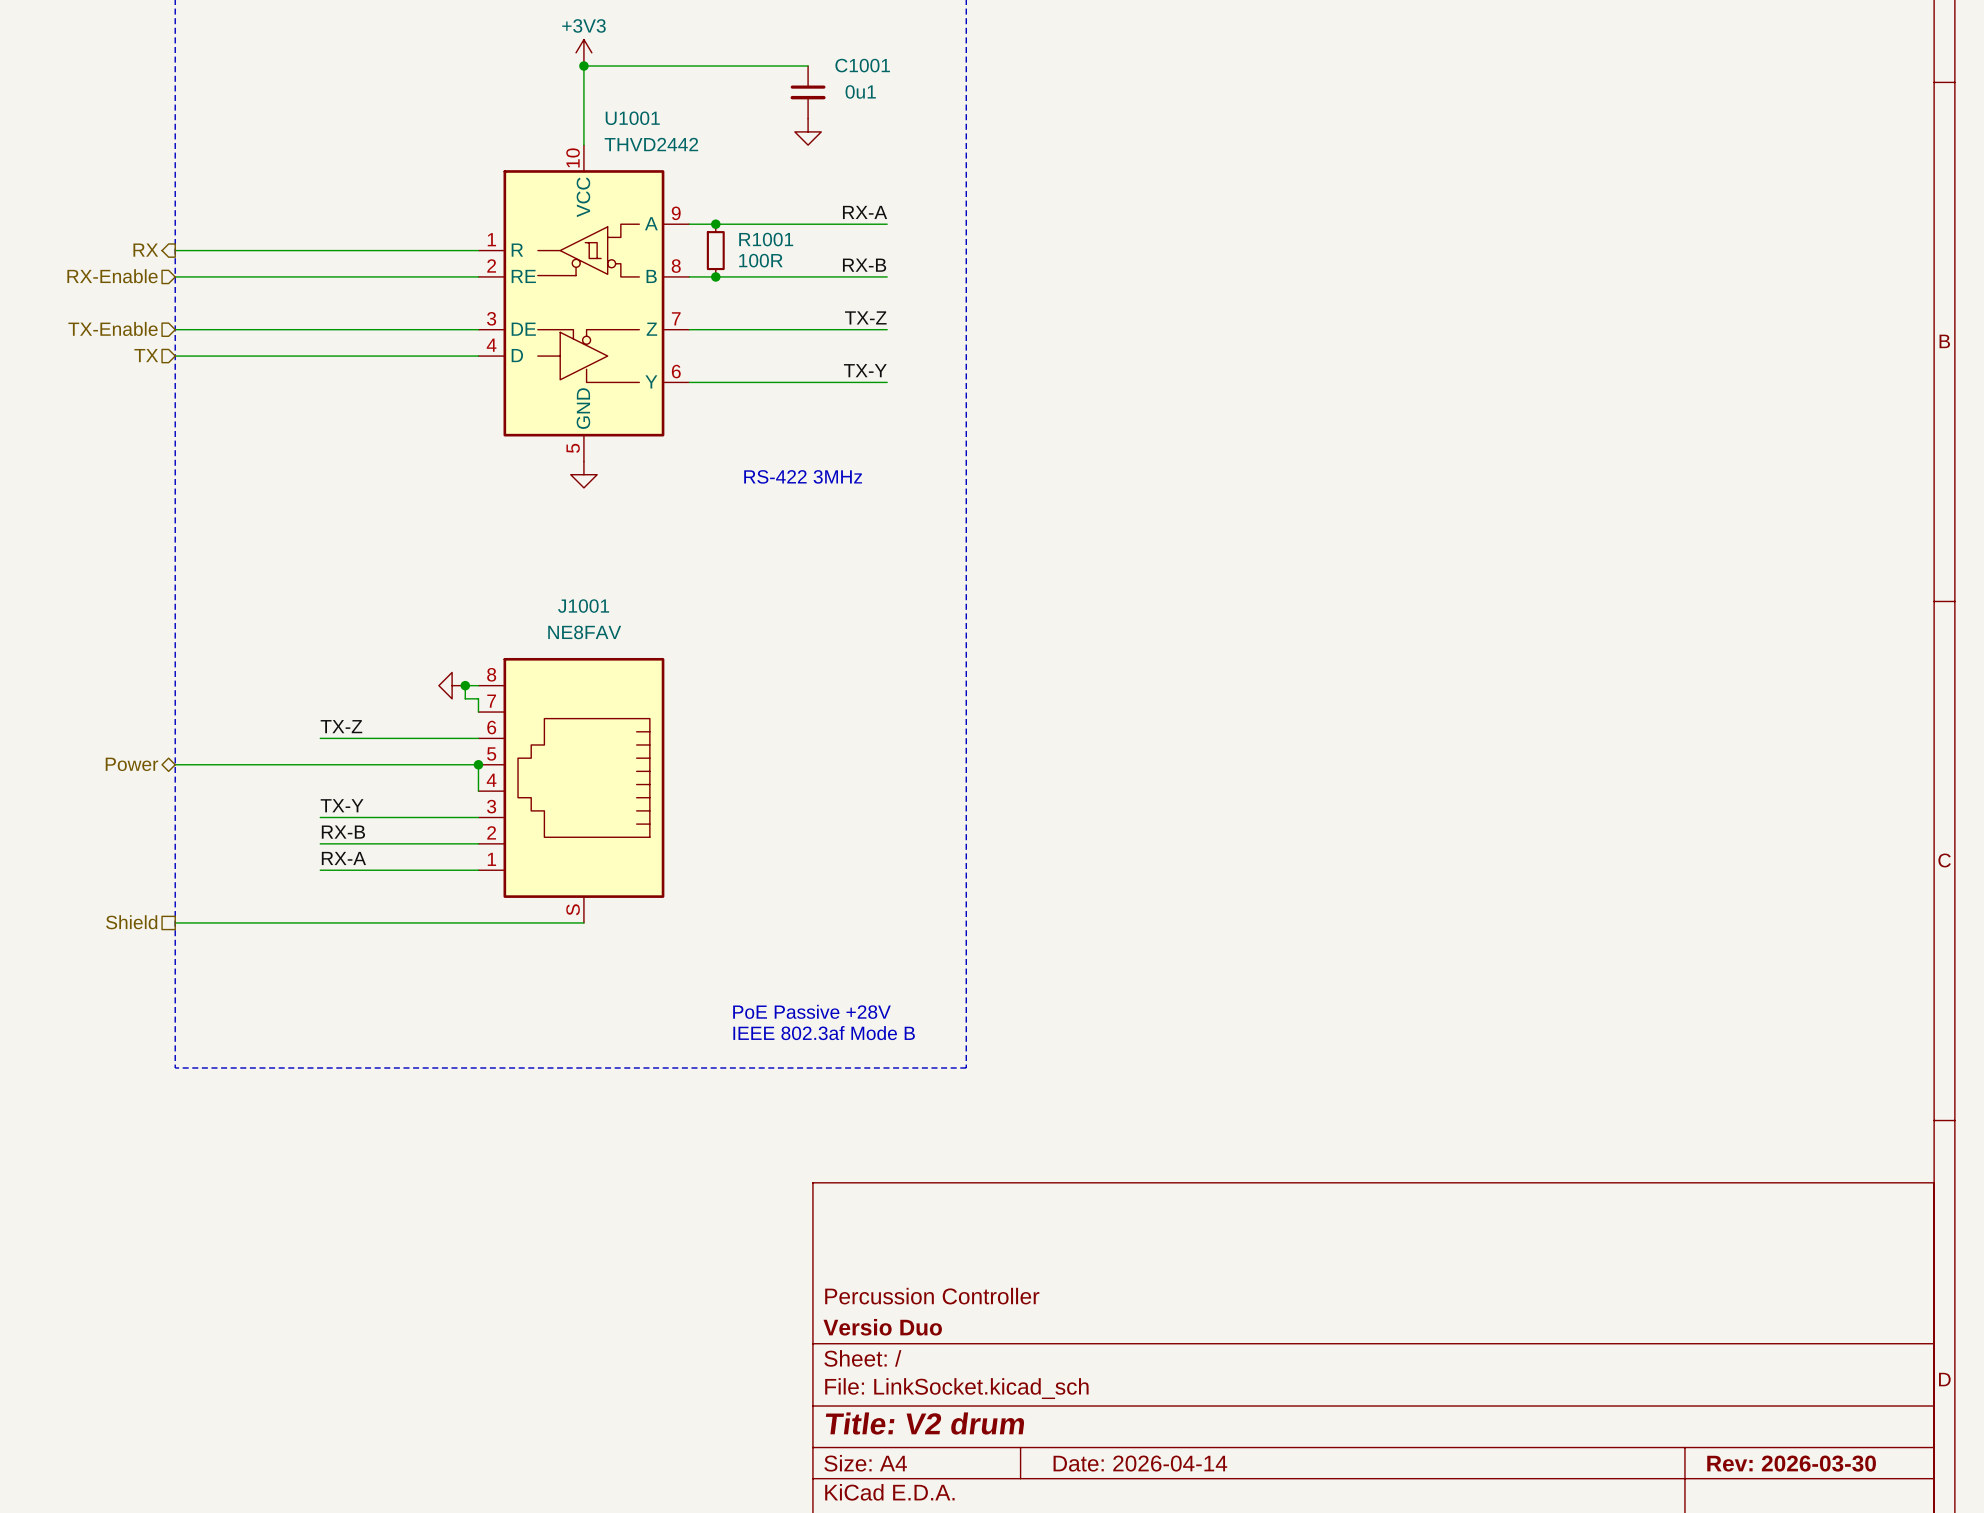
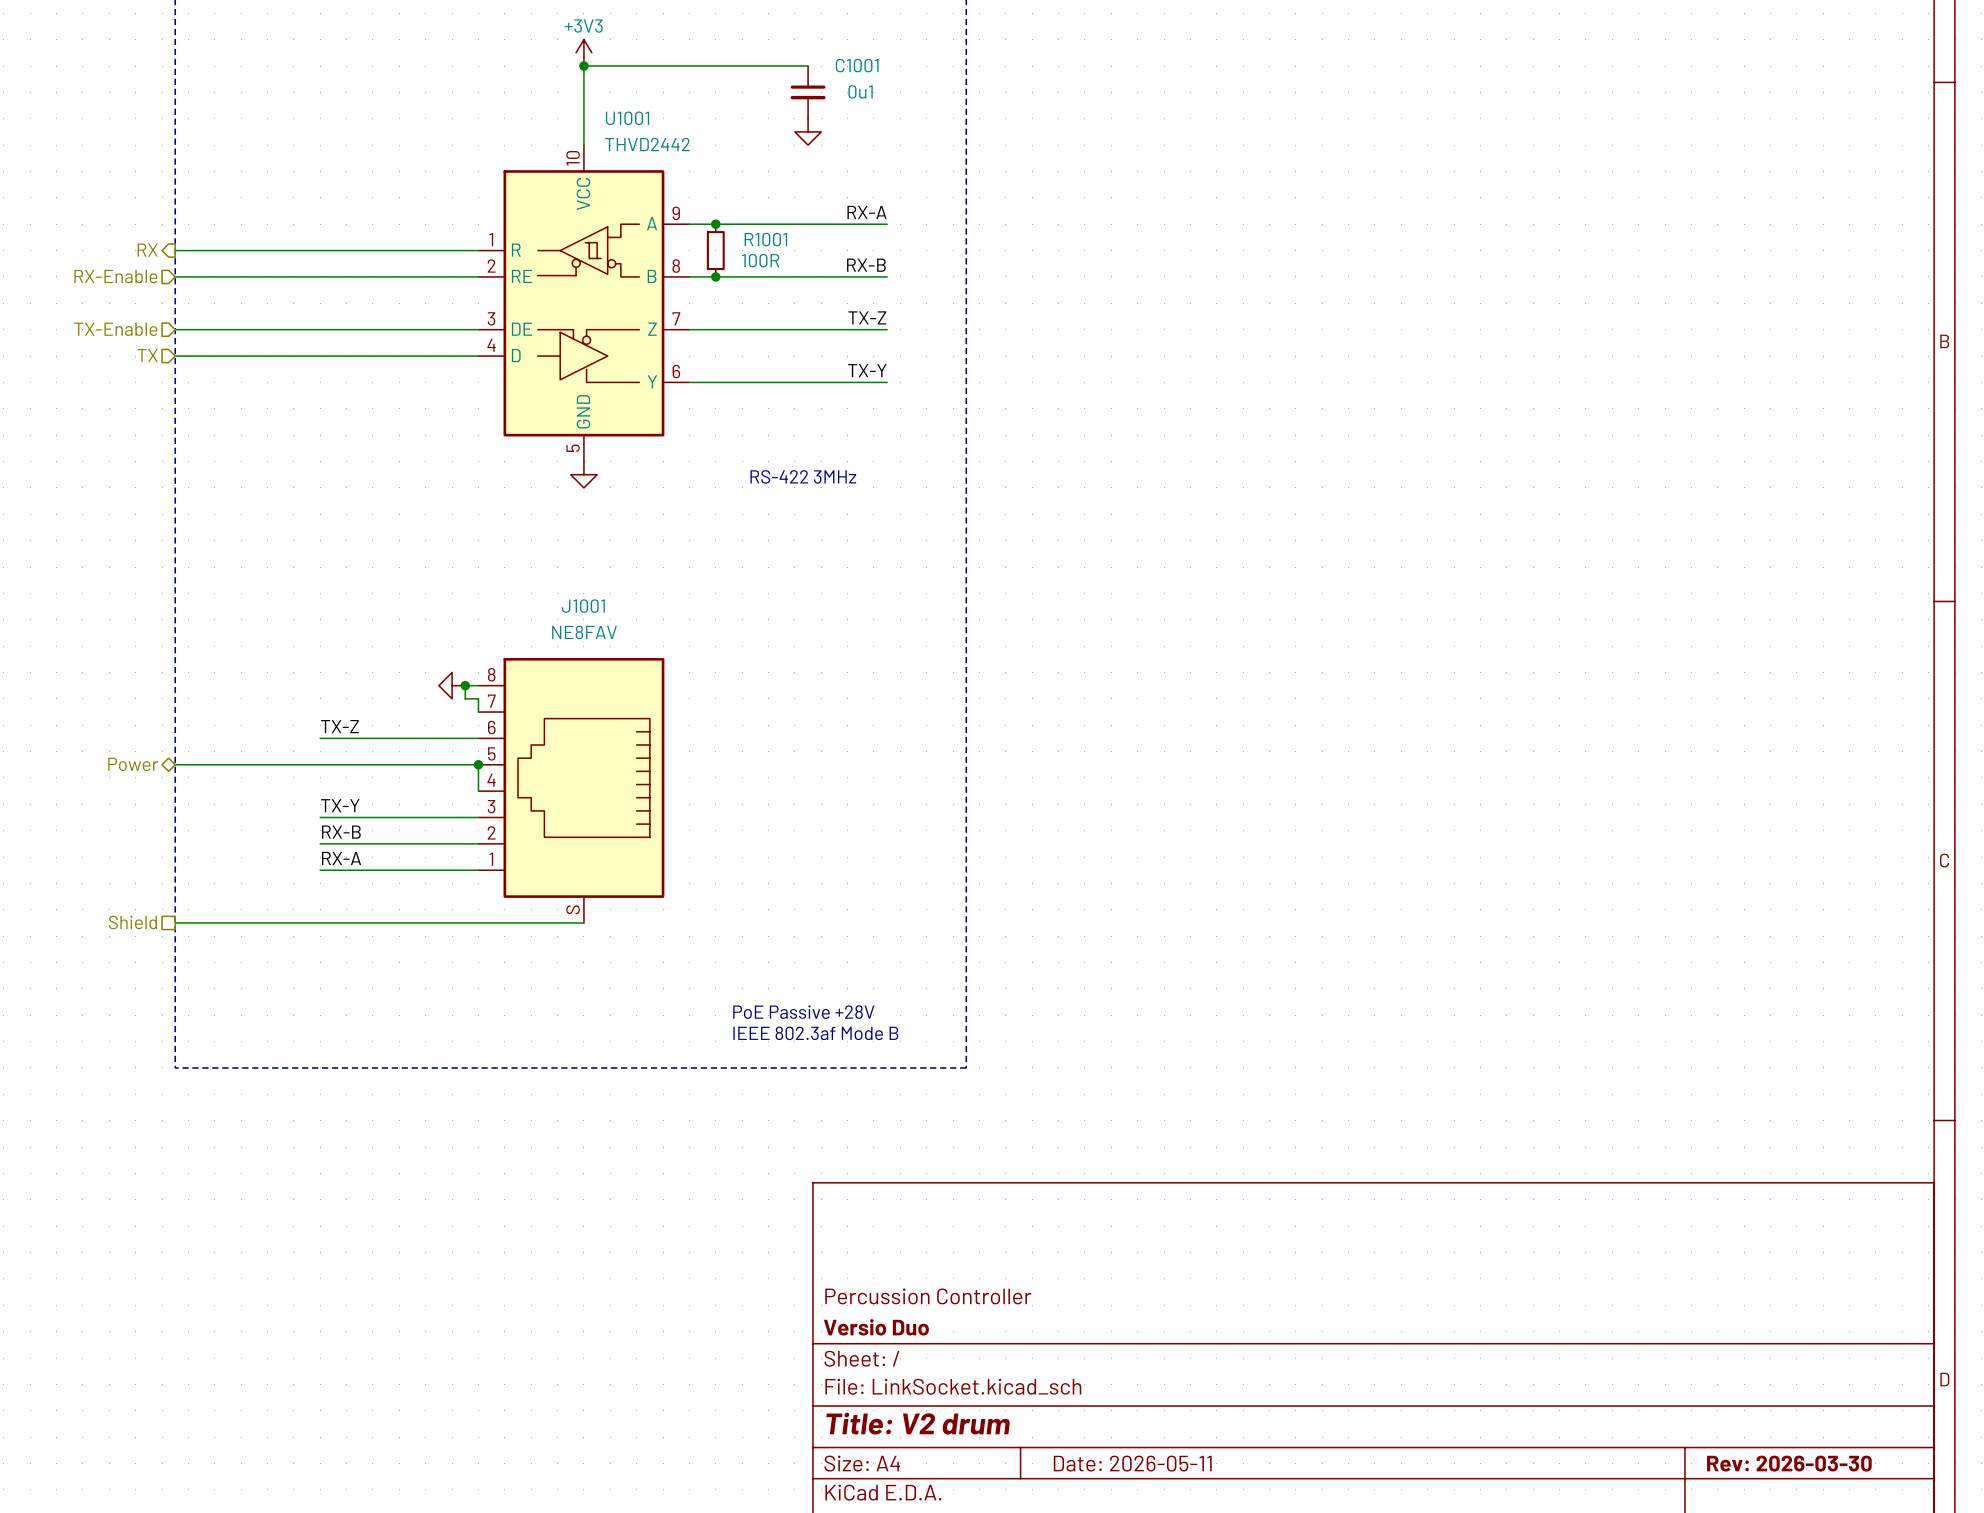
title block: Date: 2026-04-14 (1140, 1463) -> Date: 2026-05-11 (1132, 1463)

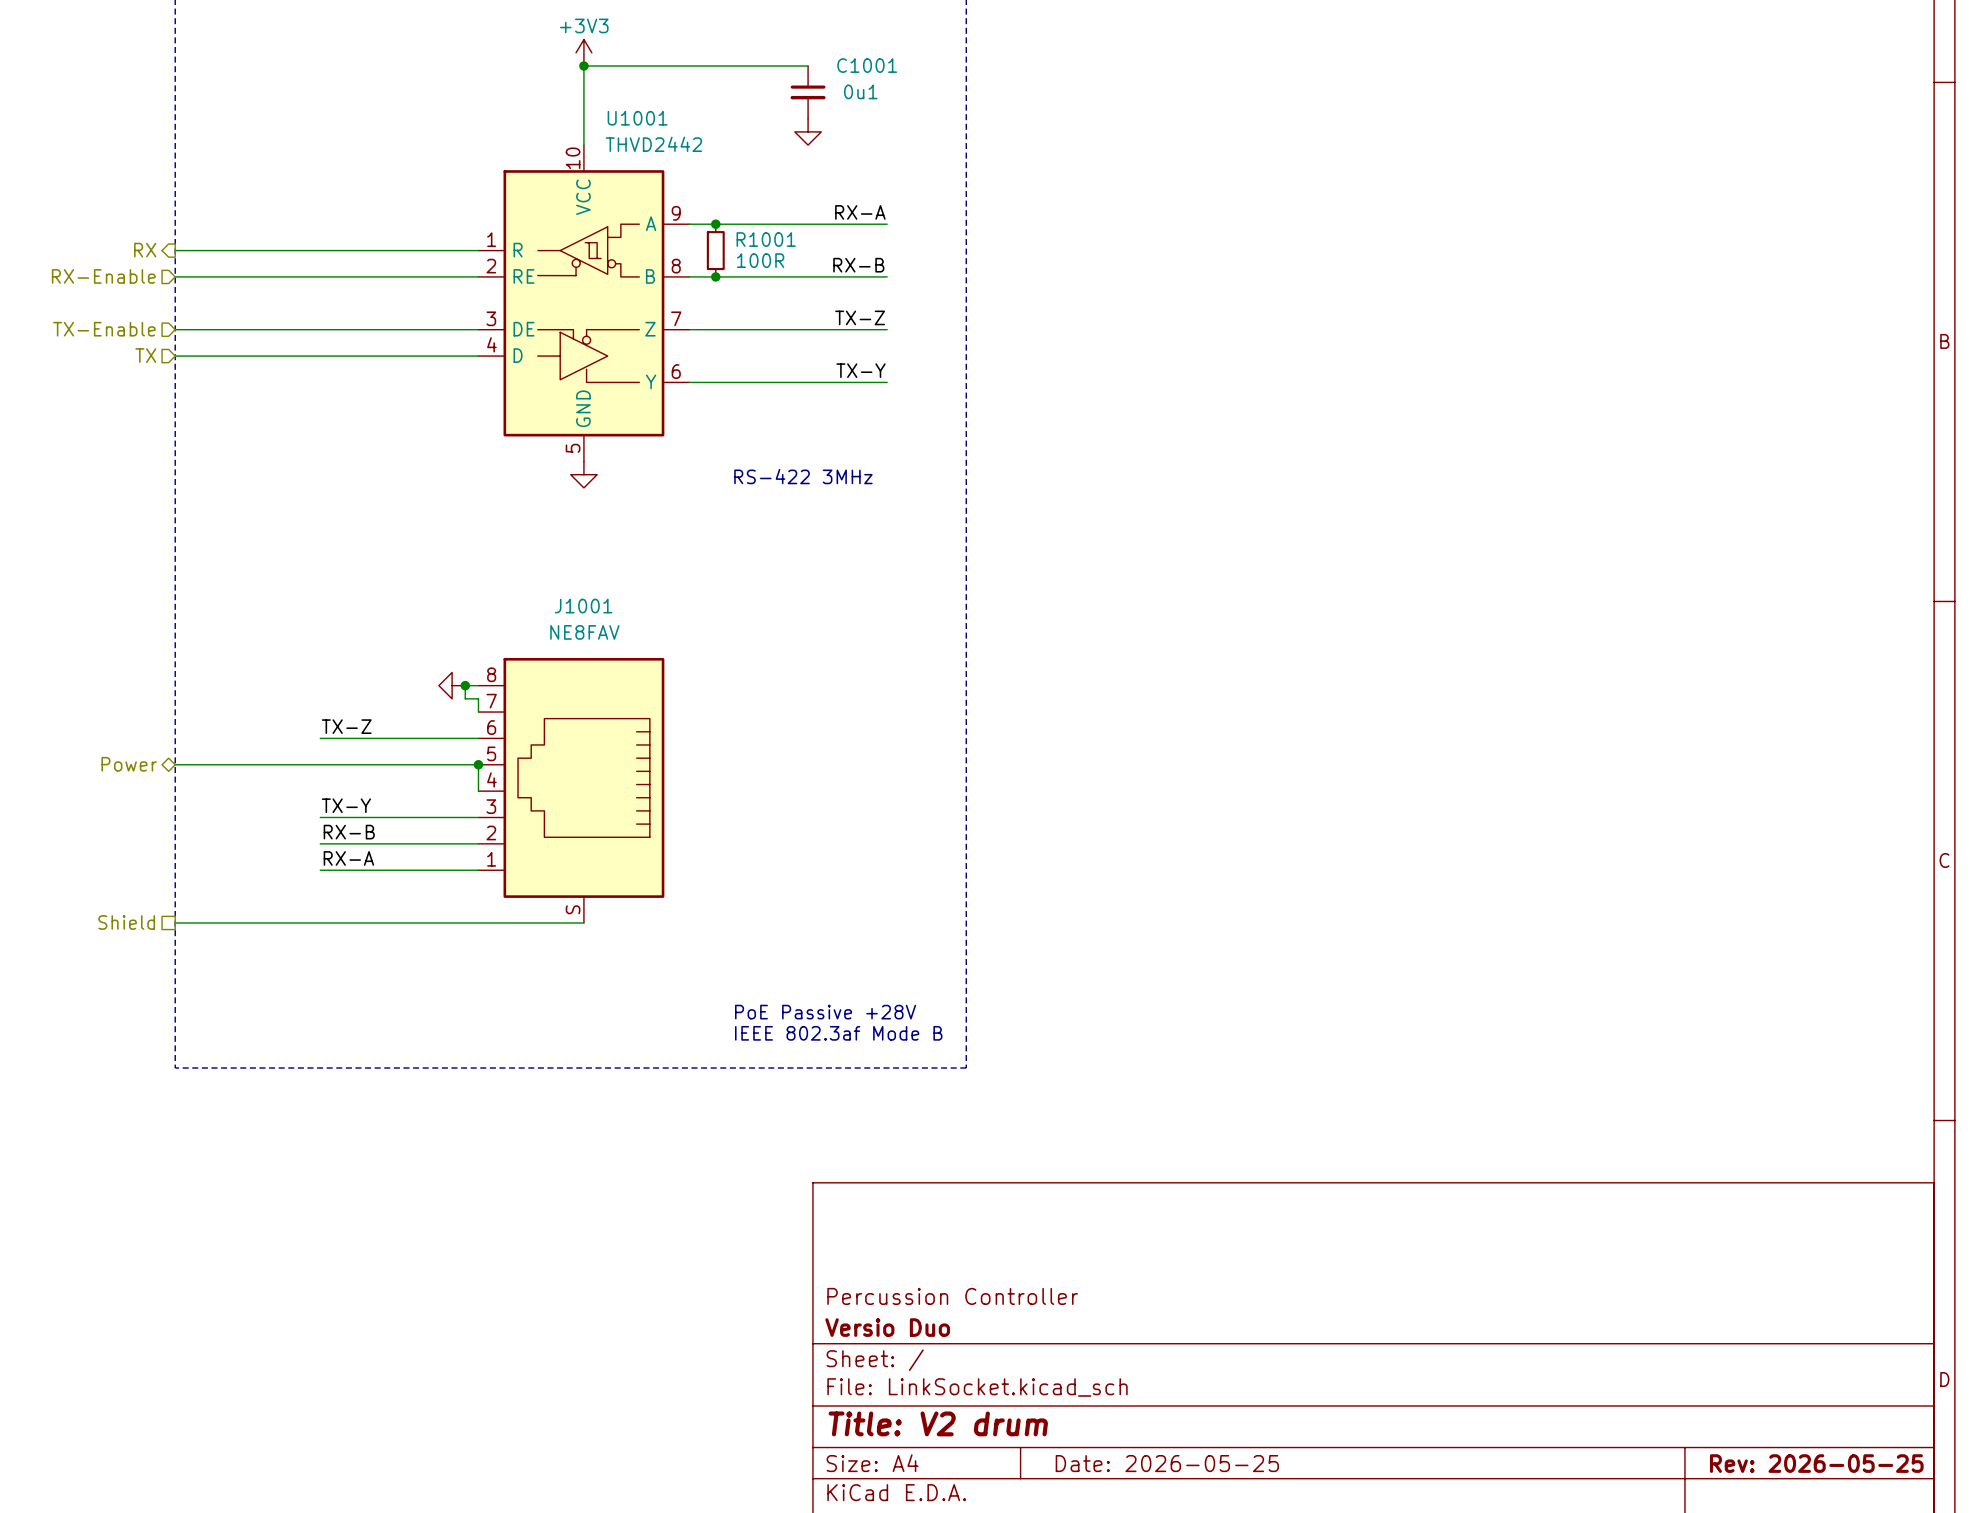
title block: Date: 2026-05-11 (1132, 1463) -> Date: 2026-05-25 (1167, 1463)
title block: Rev: 2026-03-30 (1789, 1463) -> Rev: 2026-05-25 (1816, 1463)

